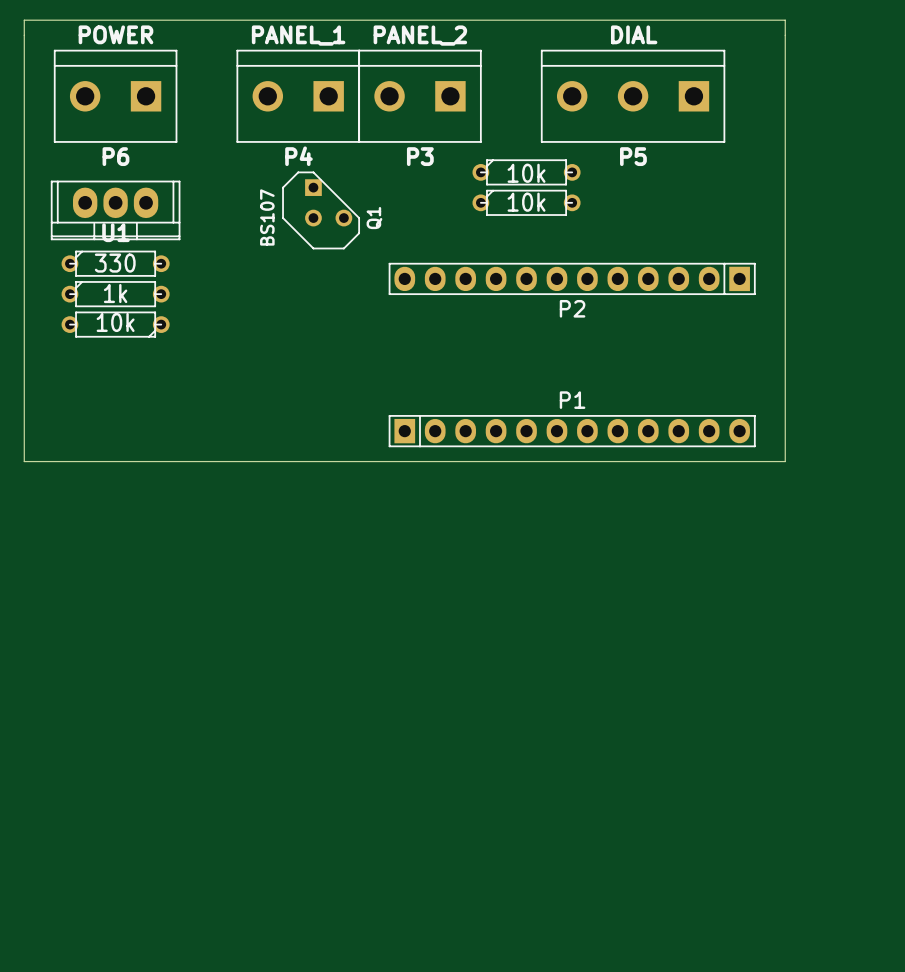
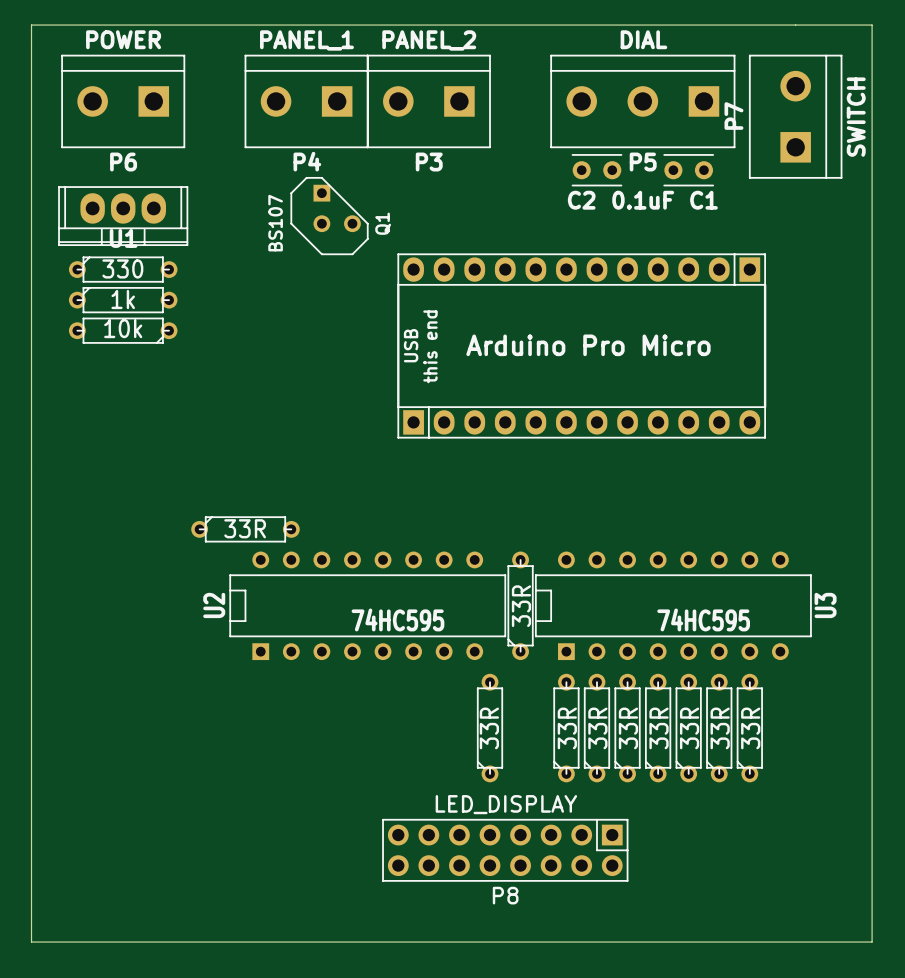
board edge: (785, 20) (785, 461) (24, 461) -> (795, 25) (872, 25) (872, 942) (31, 942) (31, 468)
P7: none -> SWITCH (795, 116)
C2: none -> 0.1uF (596, 170)
C1: none -> (688, 170)
part: 10k (526, 172) -> none
part: 10k (526, 202) -> none
part: none -> (581, 269)
line: none -> (398, 284) (398, 407)
P2: (572, 278) -> none
line: none -> (765, 284) (765, 407)
text: none -> USB (411, 345)
text: none -> Arduino Pro Micro (588, 345)
text: none -> this end (430, 346)
part: none -> (581, 422)
P1: (572, 431) -> none
part: none -> 33R (245, 529)
U2: none -> 74HC595 (367, 605)
part: none -> 33R (520, 605)
U3: none -> 74HC595 (673, 605)
part: none -> 33R (490, 728)
part: none -> 33R (566, 728)
part: none -> 33R (596, 728)
part: none -> 33R (627, 728)
part: none -> 33R (658, 728)
part: none -> 33R (688, 728)
part: none -> 33R (719, 728)
part: none -> 33R (749, 728)
P8: none -> LED_DISPLAY (505, 850)

